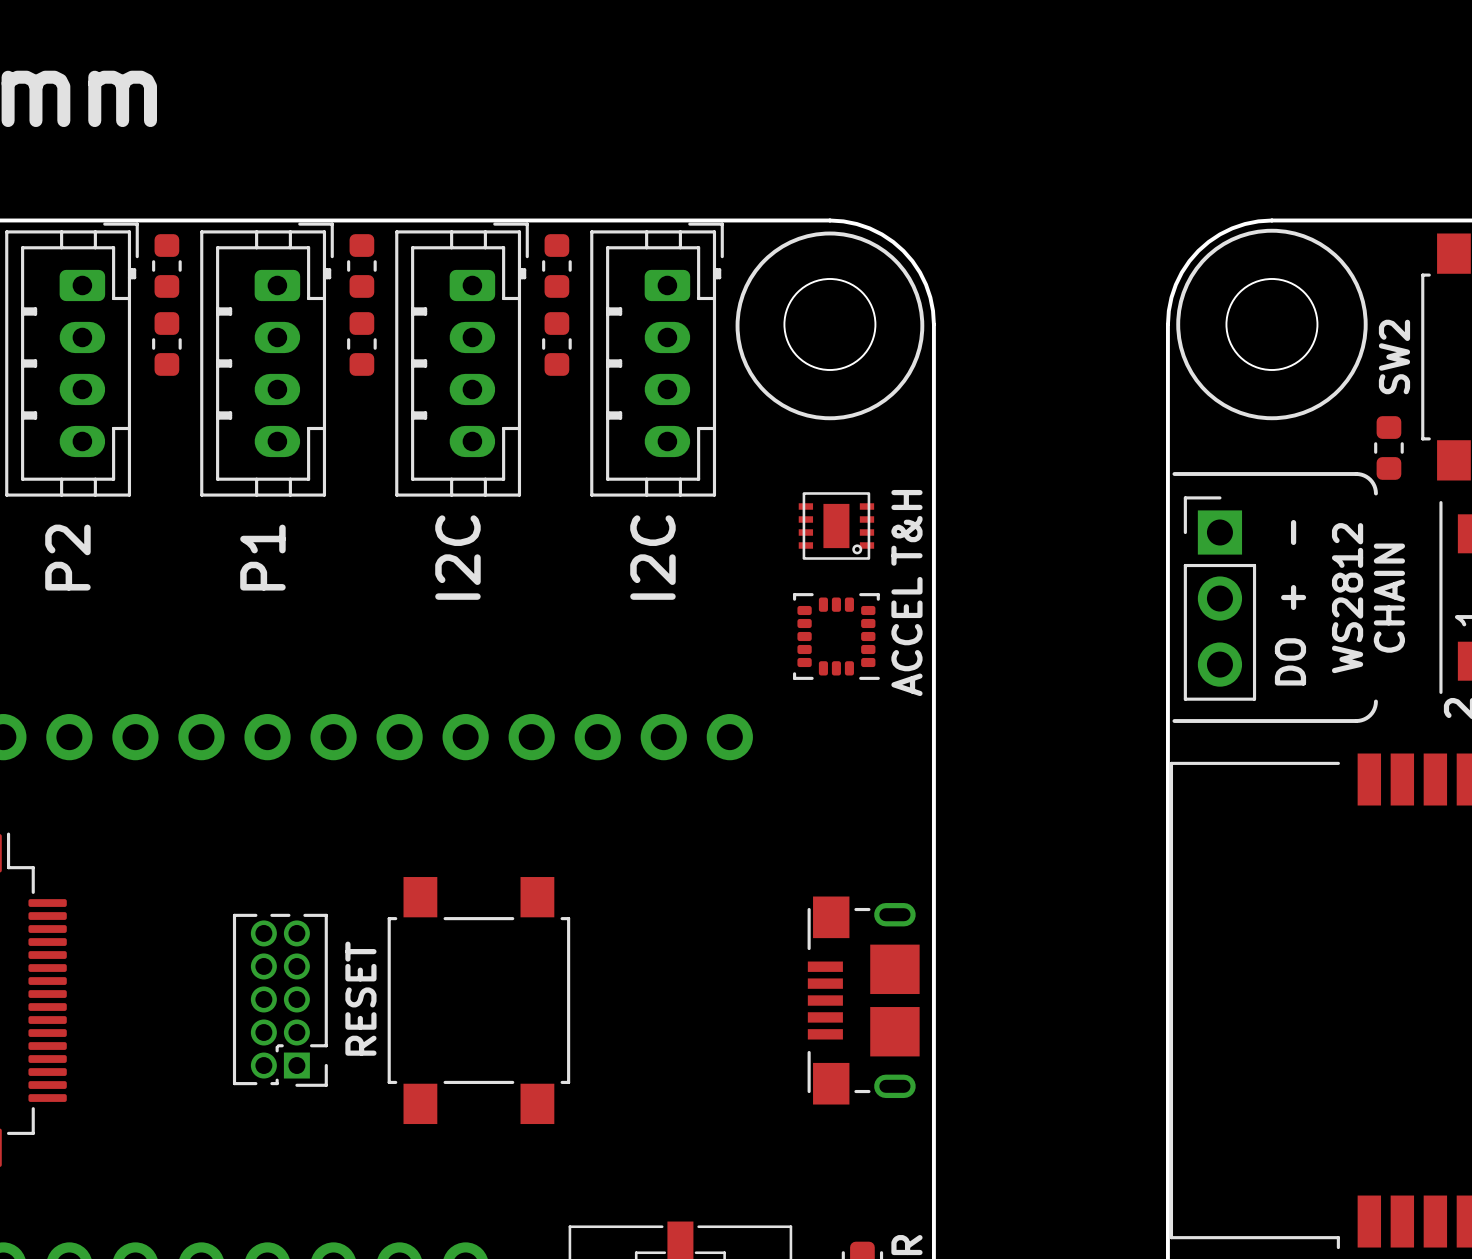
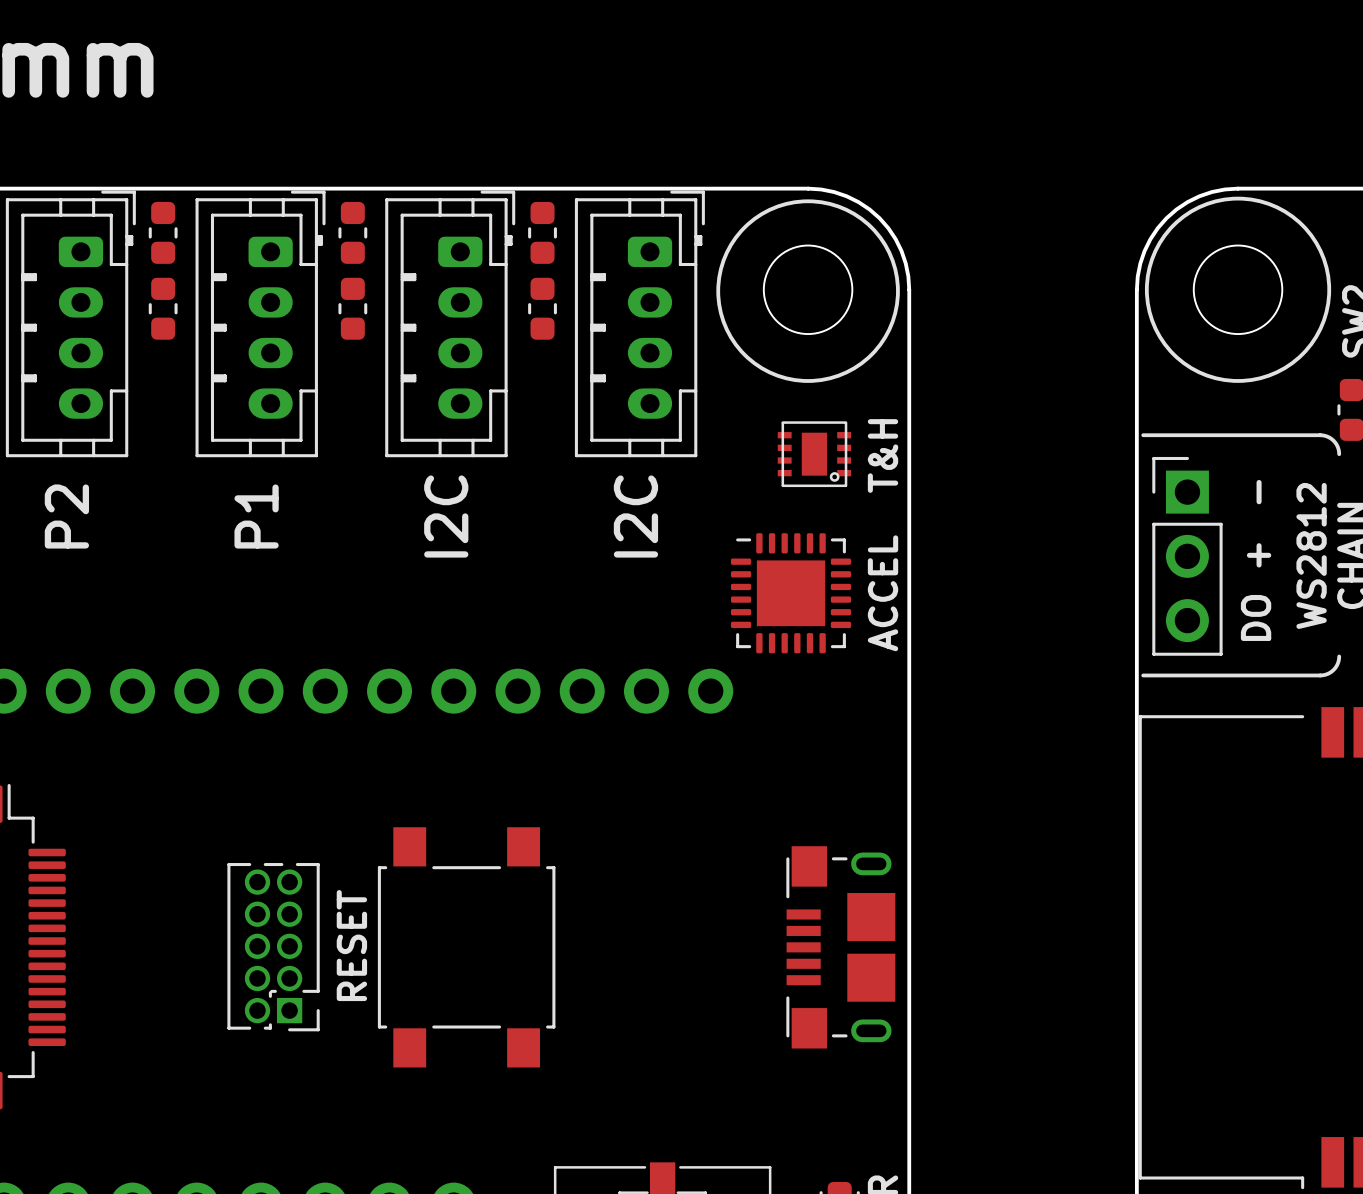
part position: (836, 526) -> (814, 454)
text position: T&H (906, 527) -> T&H (883, 455)
part footprint: [793, 593, 880, 680] -> [730, 533, 852, 654]

